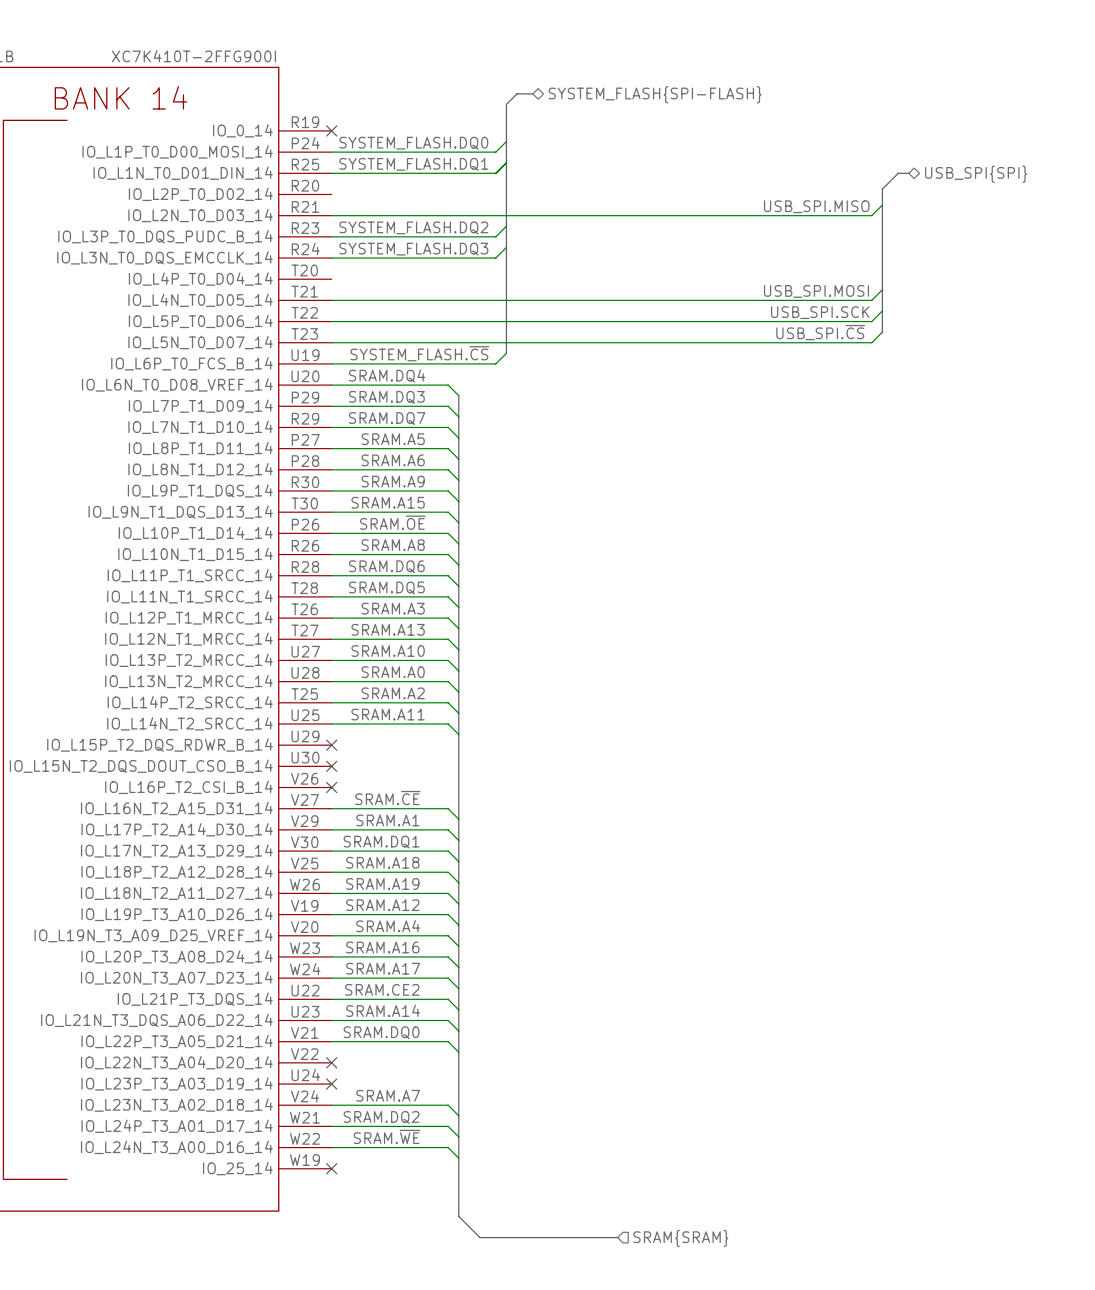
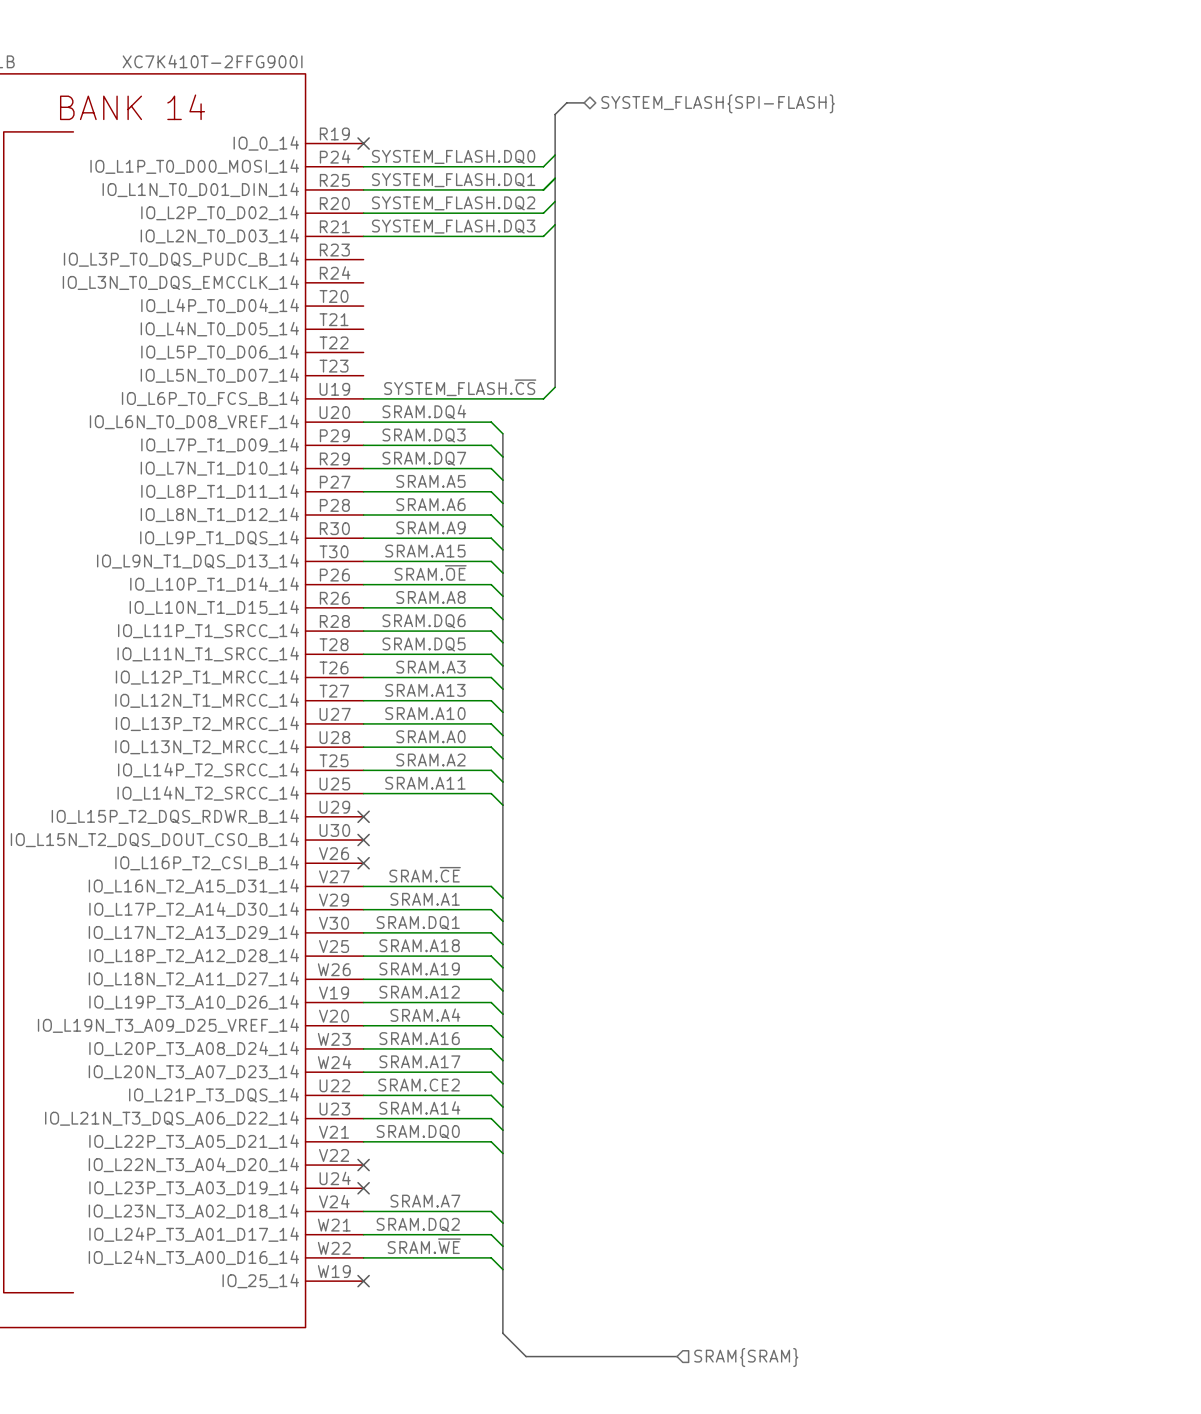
bus: (908, 173) (898, 173) (882, 189) (882, 332) -> none
hierarchical label: USB_SPI{SPI} (976, 174) -> none
wire: (882, 205) (871, 215) (495, 215) -> (555, 224) (543, 236)
label: USB_SPI.MISO (816, 206) -> none
wire: (506, 226) (495, 236) (331, 236) -> (555, 201) (543, 213) (363, 213)
label position: SYSTEM_FLASH.DQ2 (413, 227) -> SYSTEM_FLASH.DQ2 (453, 203)
wire: (506, 247) (495, 258) (331, 258) -> none
label position: SYSTEM_FLASH.DQ3 (413, 249) -> SYSTEM_FLASH.DQ3 (453, 226)
wire: (882, 289) (871, 300) (331, 300) -> none
label: USB_SPI.MOSI (816, 291) -> none
wire: (882, 310) (871, 321) (331, 321) -> none
label: USB_SPI.SCK (820, 312) -> none
label: USB_SPI.~{CS} (820, 332) -> none
wire: (882, 332) (871, 342) (331, 342) -> none

